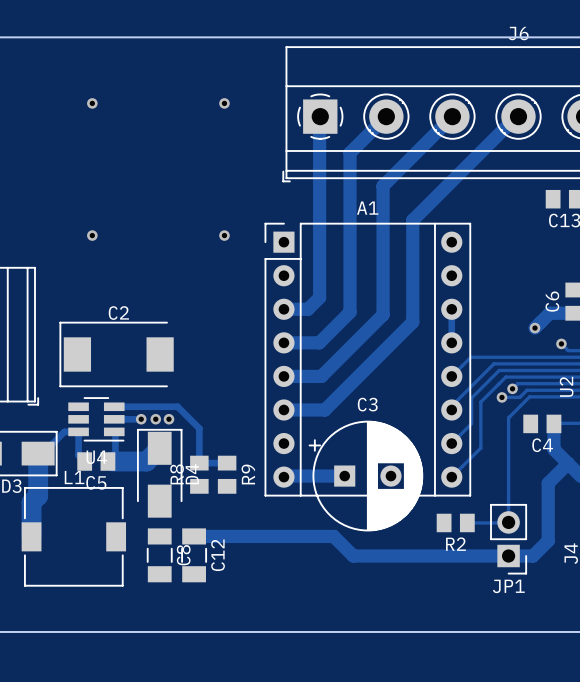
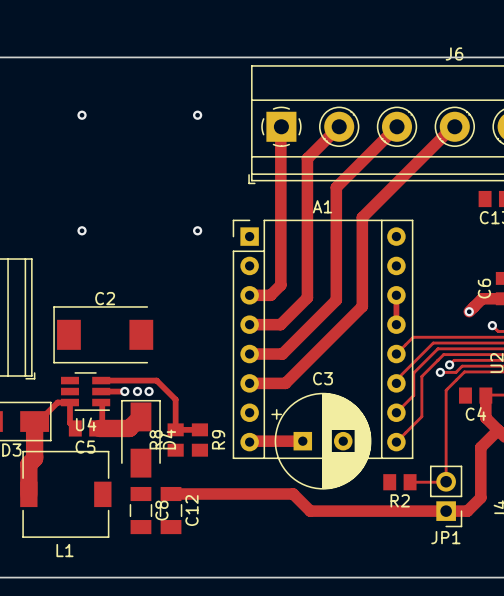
L1 name position: L1 (74, 477) -> L1 (64, 550)

